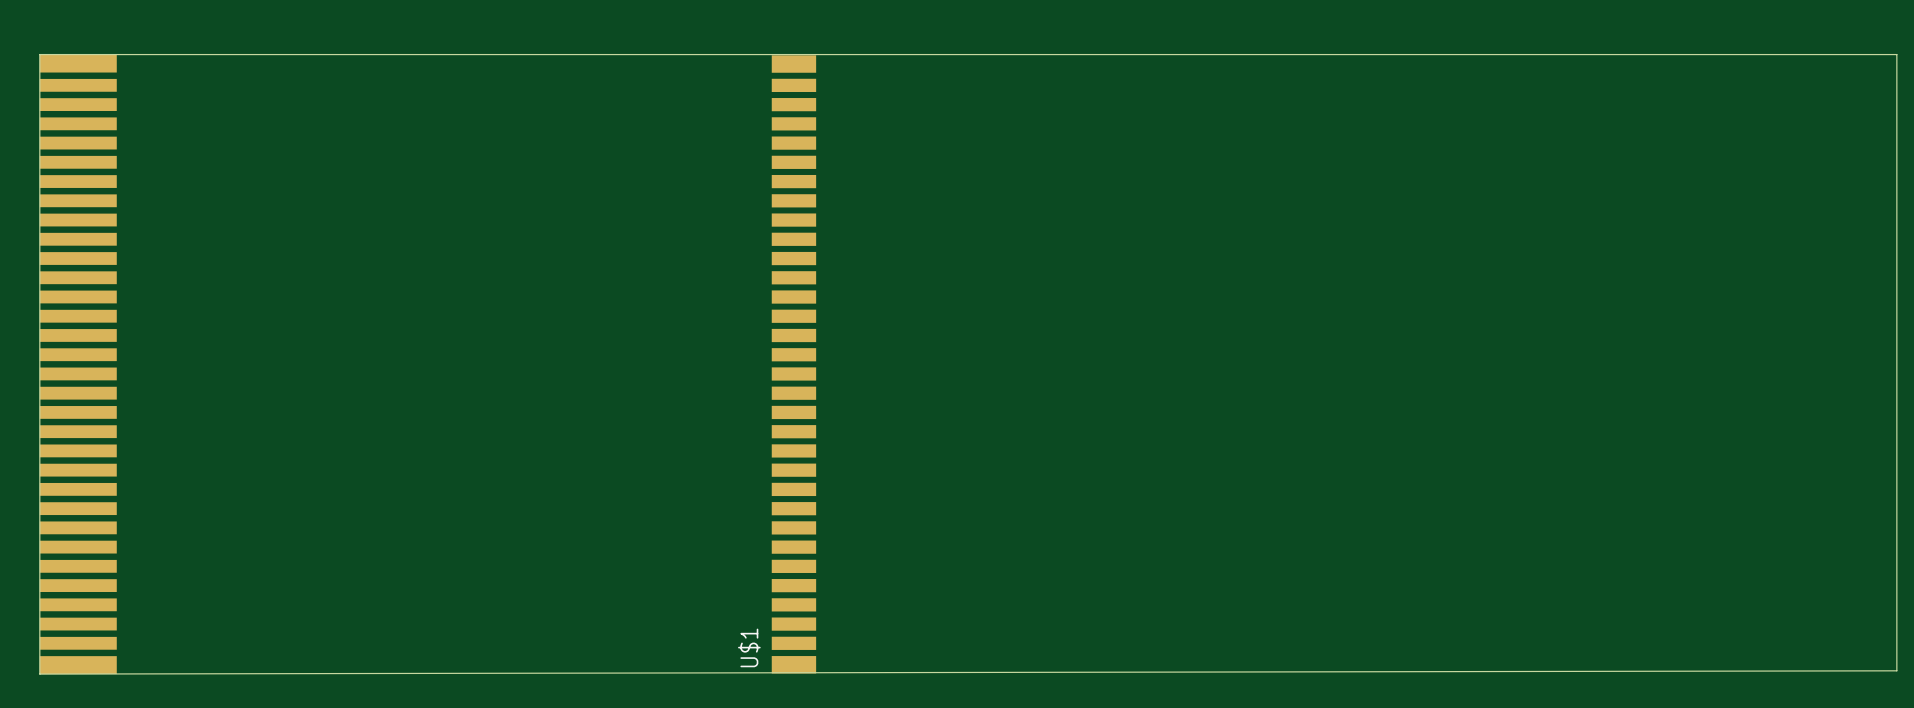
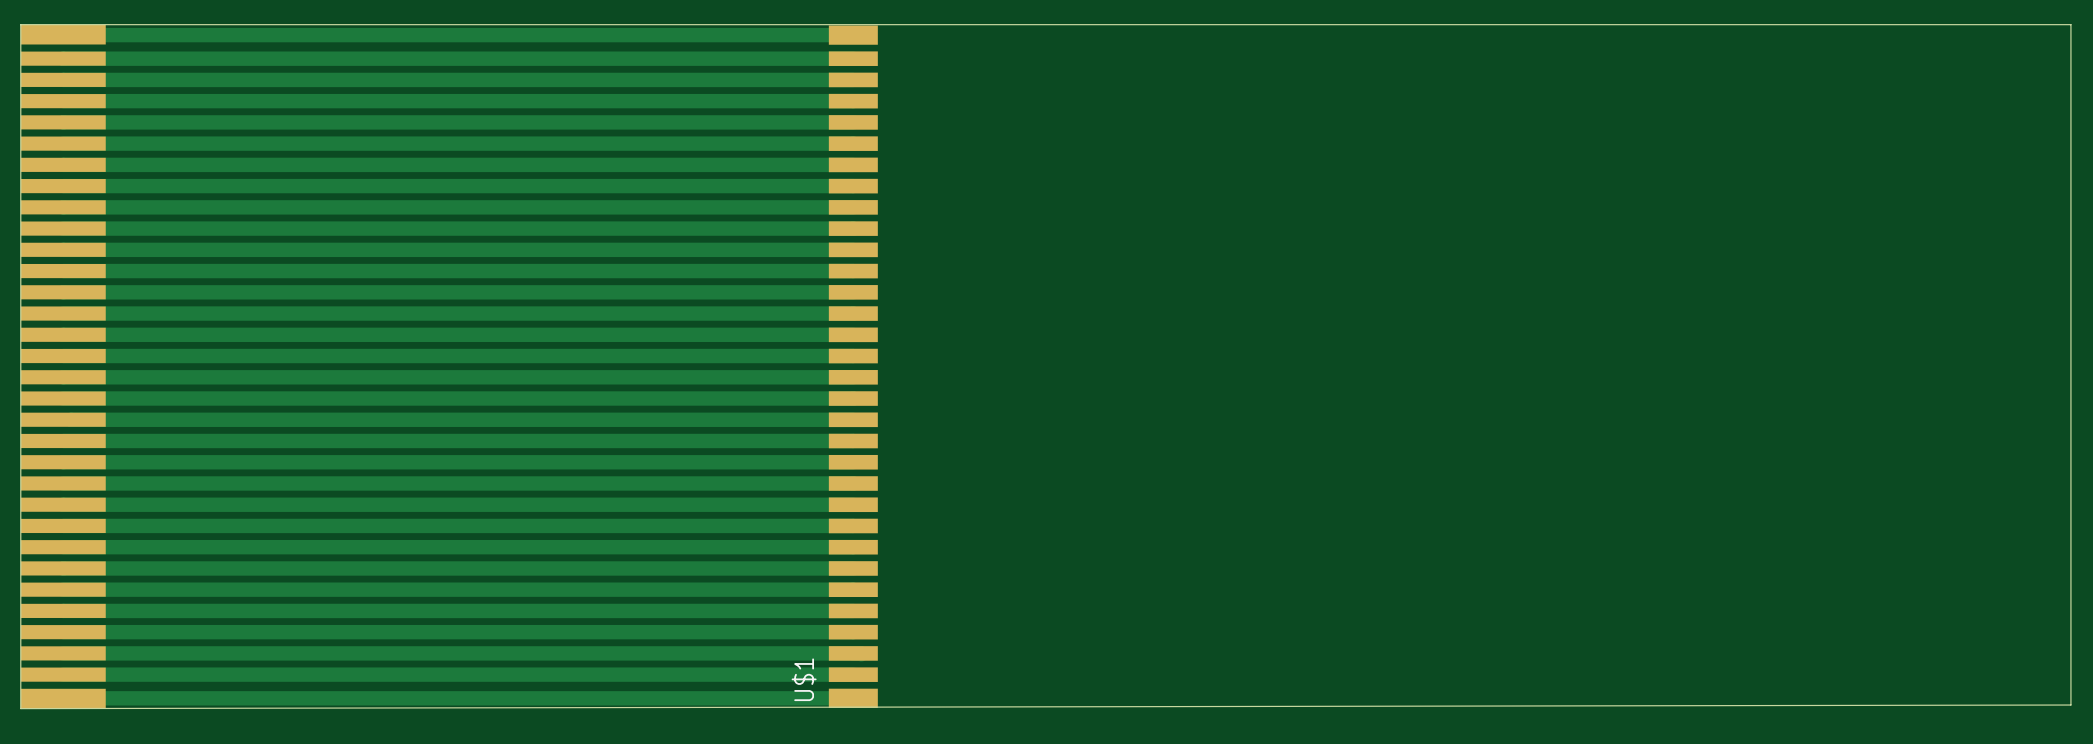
track: none -> (63, 34) (853, 35)
track: none -> (63, 58) (853, 58)
track: none -> (63, 79) (853, 79)
track: none -> (63, 101) (853, 101)
track: none -> (63, 122) (853, 122)
track: none -> (63, 143) (853, 143)
track: none -> (63, 164) (853, 164)
track: none -> (63, 186) (853, 186)
track: none -> (63, 207) (853, 207)
track: none -> (63, 228) (853, 228)
track: none -> (63, 249) (853, 249)
track: none -> (63, 271) (853, 271)
track: none -> (63, 292) (853, 292)
track: none -> (63, 313) (853, 313)
track: none -> (63, 334) (853, 334)
track: none -> (63, 356) (853, 356)
track: none -> (63, 377) (853, 377)
track: none -> (63, 398) (853, 398)
track: none -> (71, 419) (853, 419)
track: none -> (63, 440) (853, 440)
track: none -> (63, 462) (853, 462)
track: none -> (63, 483) (853, 483)
track: none -> (63, 504) (853, 504)
track: none -> (63, 525) (853, 525)
track: none -> (63, 547) (853, 547)
track: none -> (63, 568) (853, 568)
track: none -> (63, 589) (853, 589)
track: none -> (63, 610) (853, 610)
track: none -> (63, 632) (853, 632)
track: none -> (63, 653) (861, 654)
track: none -> (63, 674) (853, 674)
track: none -> (853, 698) (63, 698)

